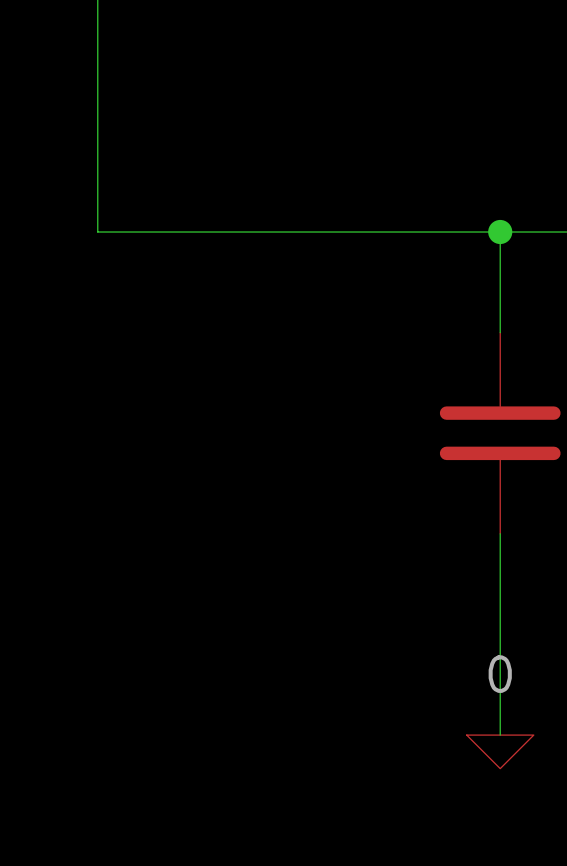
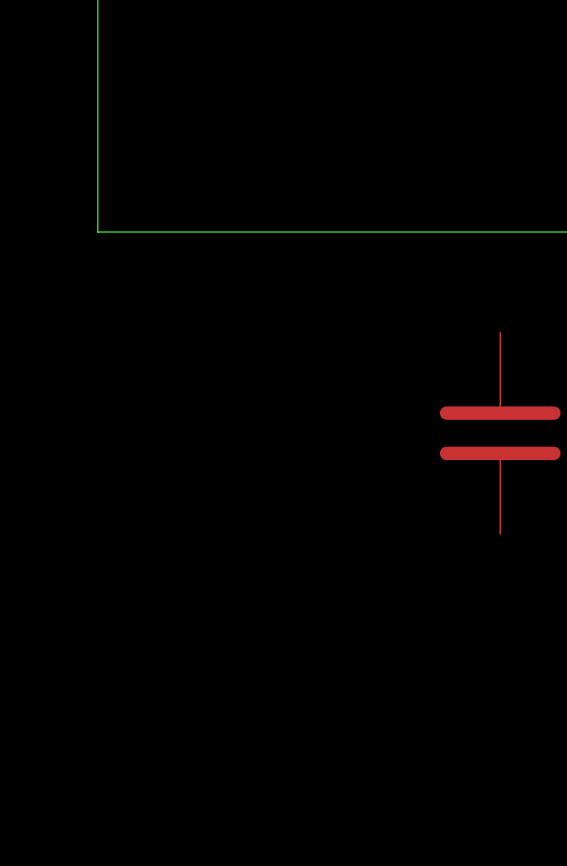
wire: (500, 232) (500, 332) -> none
junction: (500, 232) -> none
wire: (500, 533) (500, 735) -> none
power symbol: 0 (500, 751) -> none

